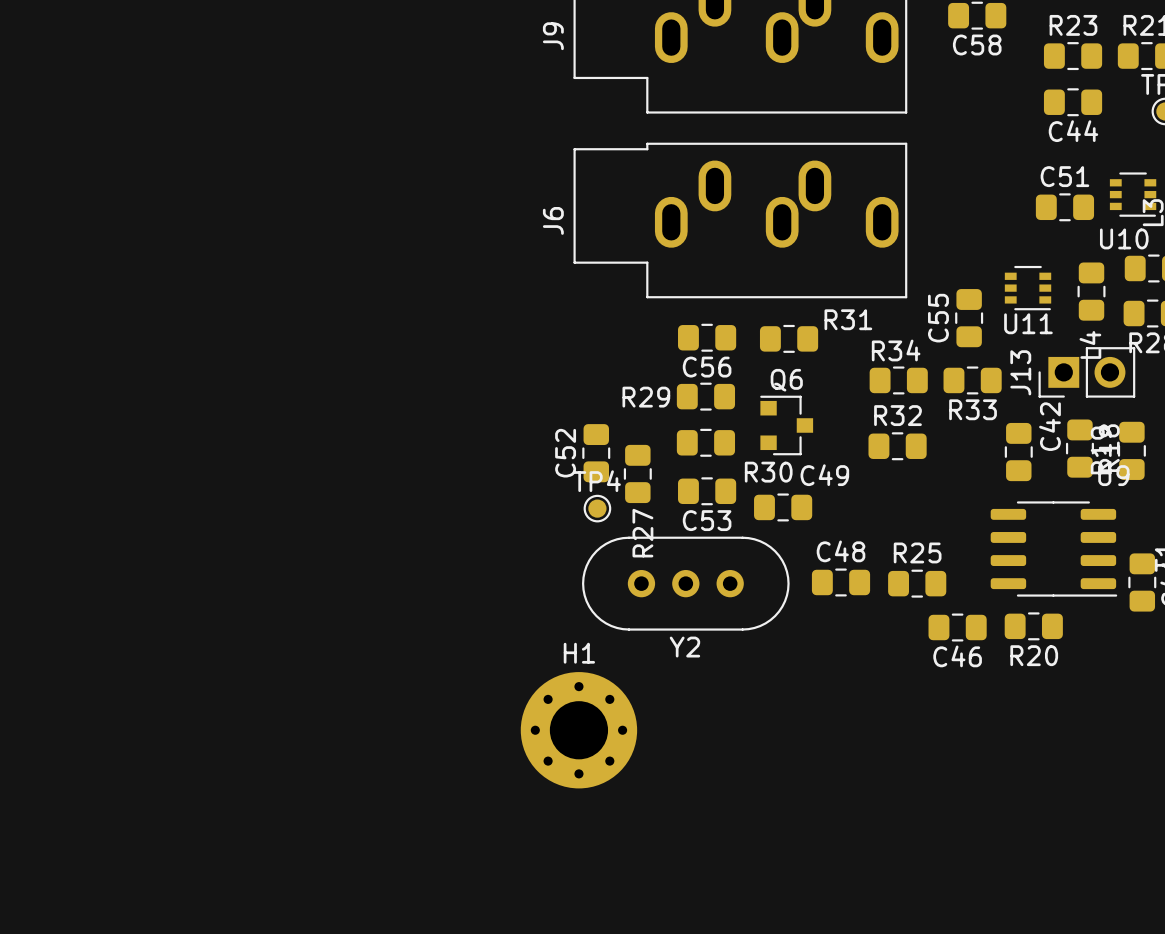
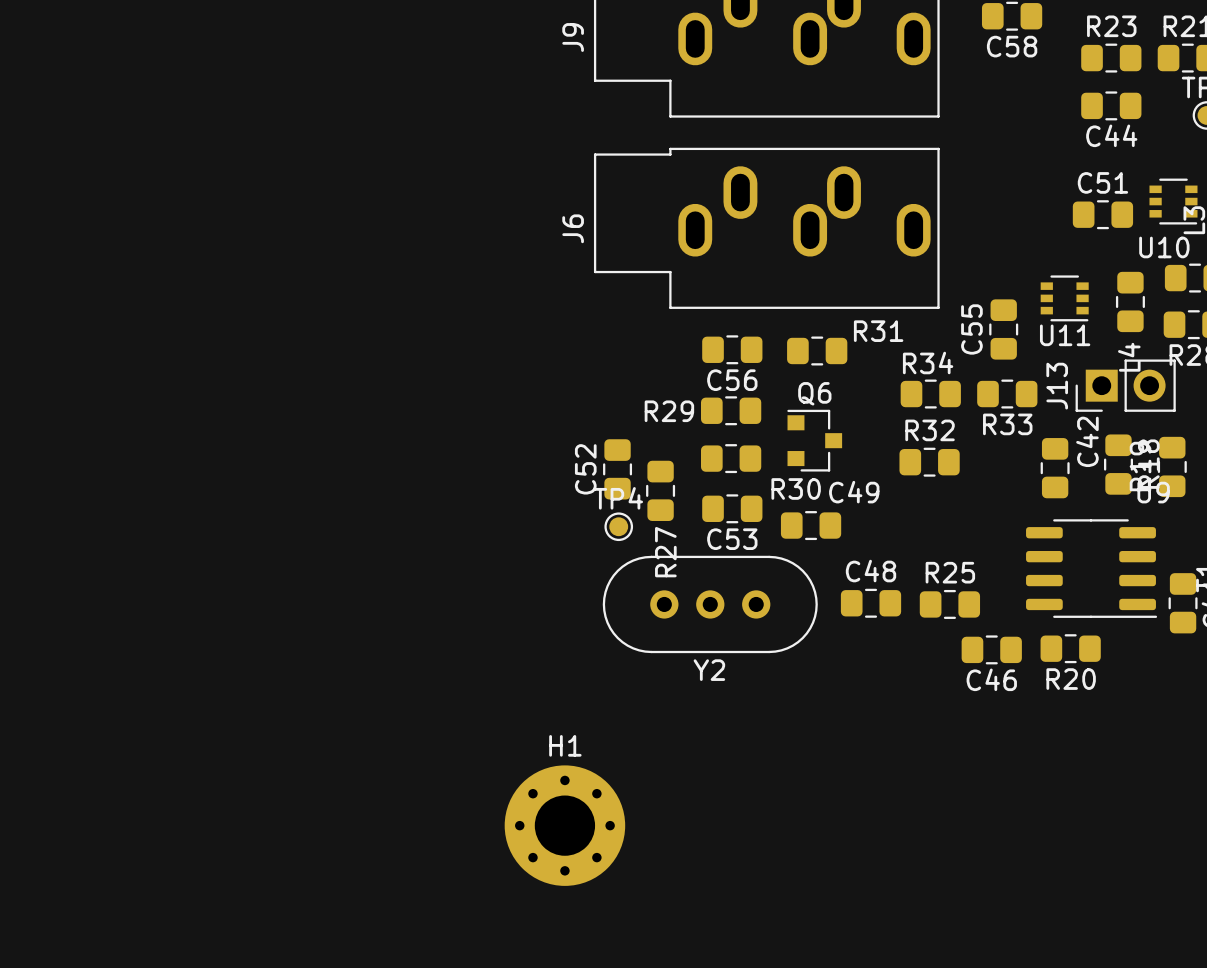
H1 position: (578, 730) -> (564, 825)

